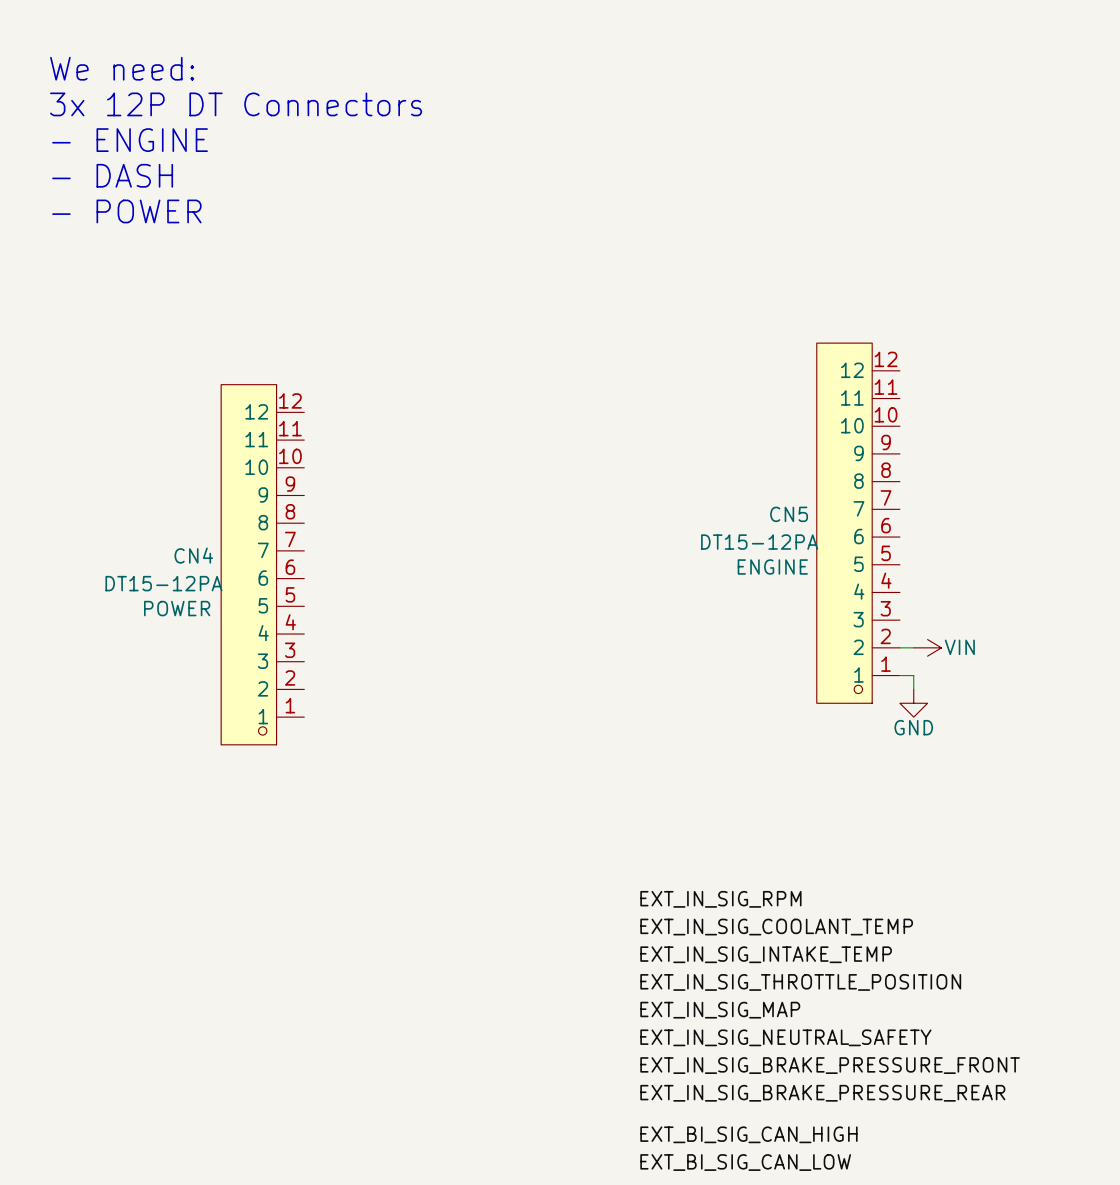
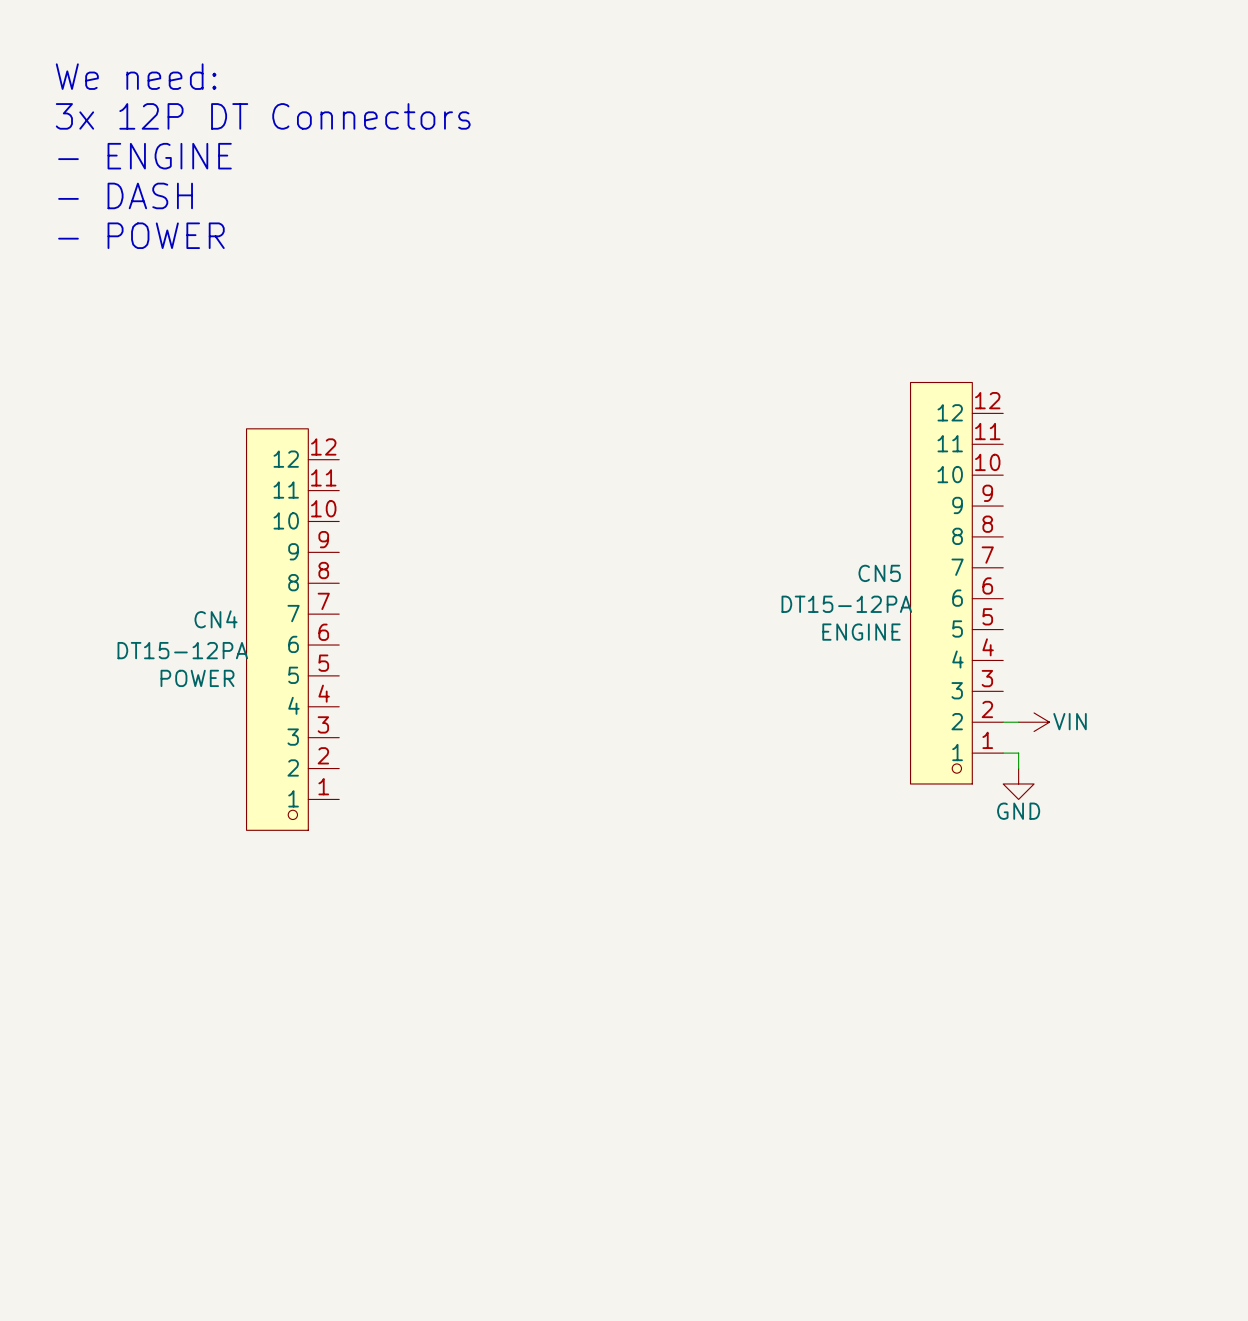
label: EXT_IN_SIG_RPM (720, 899) -> none
label: EXT_IN_SIG_COOLANT_TEMP (776, 927) -> none
label: EXT_IN_SIG_INTAKE_TEMP (766, 954) -> none
label: EXT_IN_SIG_THROTTLE_POSITION (800, 982) -> none
label: EXT_IN_SIG_MAP (720, 1010) -> none
label: EXT_IN_SIG_NEUTRAL_SAFETY (785, 1037) -> none
label: EXT_IN_SIG_BRAKE_PRESSURE_FRONT (830, 1065) -> none
label: EXT_IN_SIG_BRAKE_PRESSURE_REAR (822, 1093) -> none
label: EXT_BI_SIG_CAN_HIGH (748, 1134) -> none
label: EXT_BI_SIG_CAN_LOW (745, 1162) -> none

